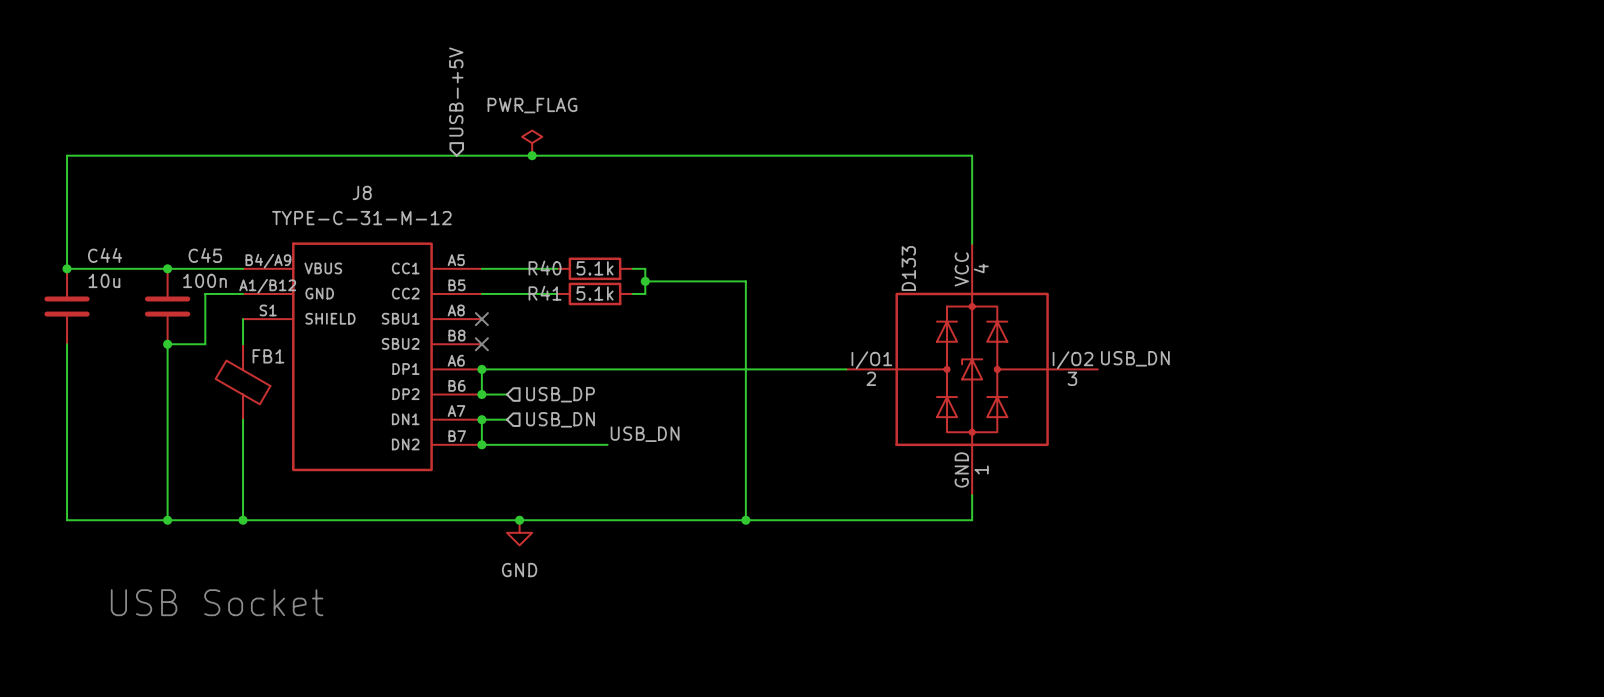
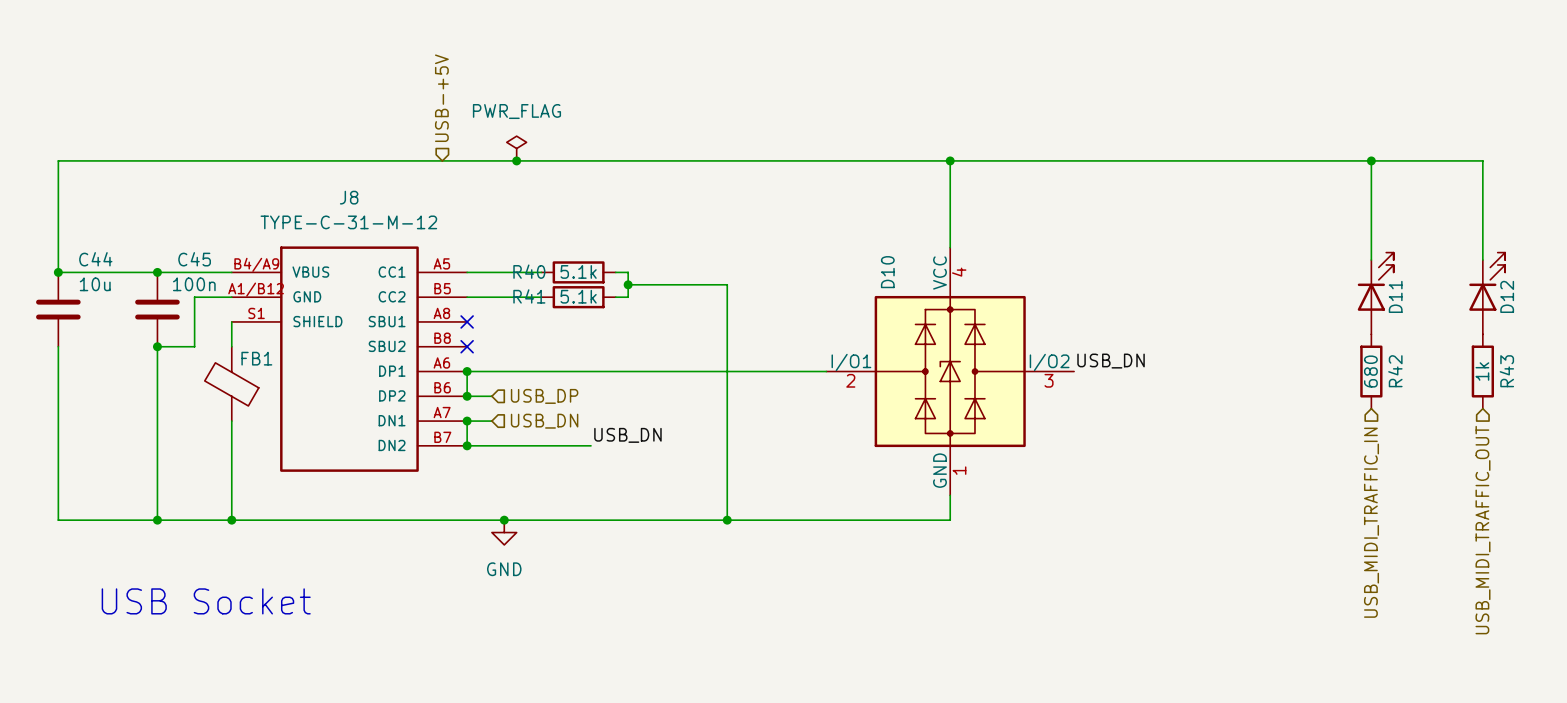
wire: none -> (950, 160) (1482, 160) (1482, 260)
junction: none -> (950, 160)
wire: none -> (1371, 160) (1371, 260)
junction: none -> (1371, 160)
D133 name: D133 (908, 268) -> D10 (887, 272)
D11: none -> (1375, 293)
D12: none -> (1487, 293)
R42: none -> 680 (1371, 371)
R43: none -> 1k (1482, 371)
hierarchical label: none -> USB_MIDI_TRAFFIC_IN (1371, 522)
hierarchical label: none -> USB_MIDI_TRAFFIC_OUT (1482, 530)

